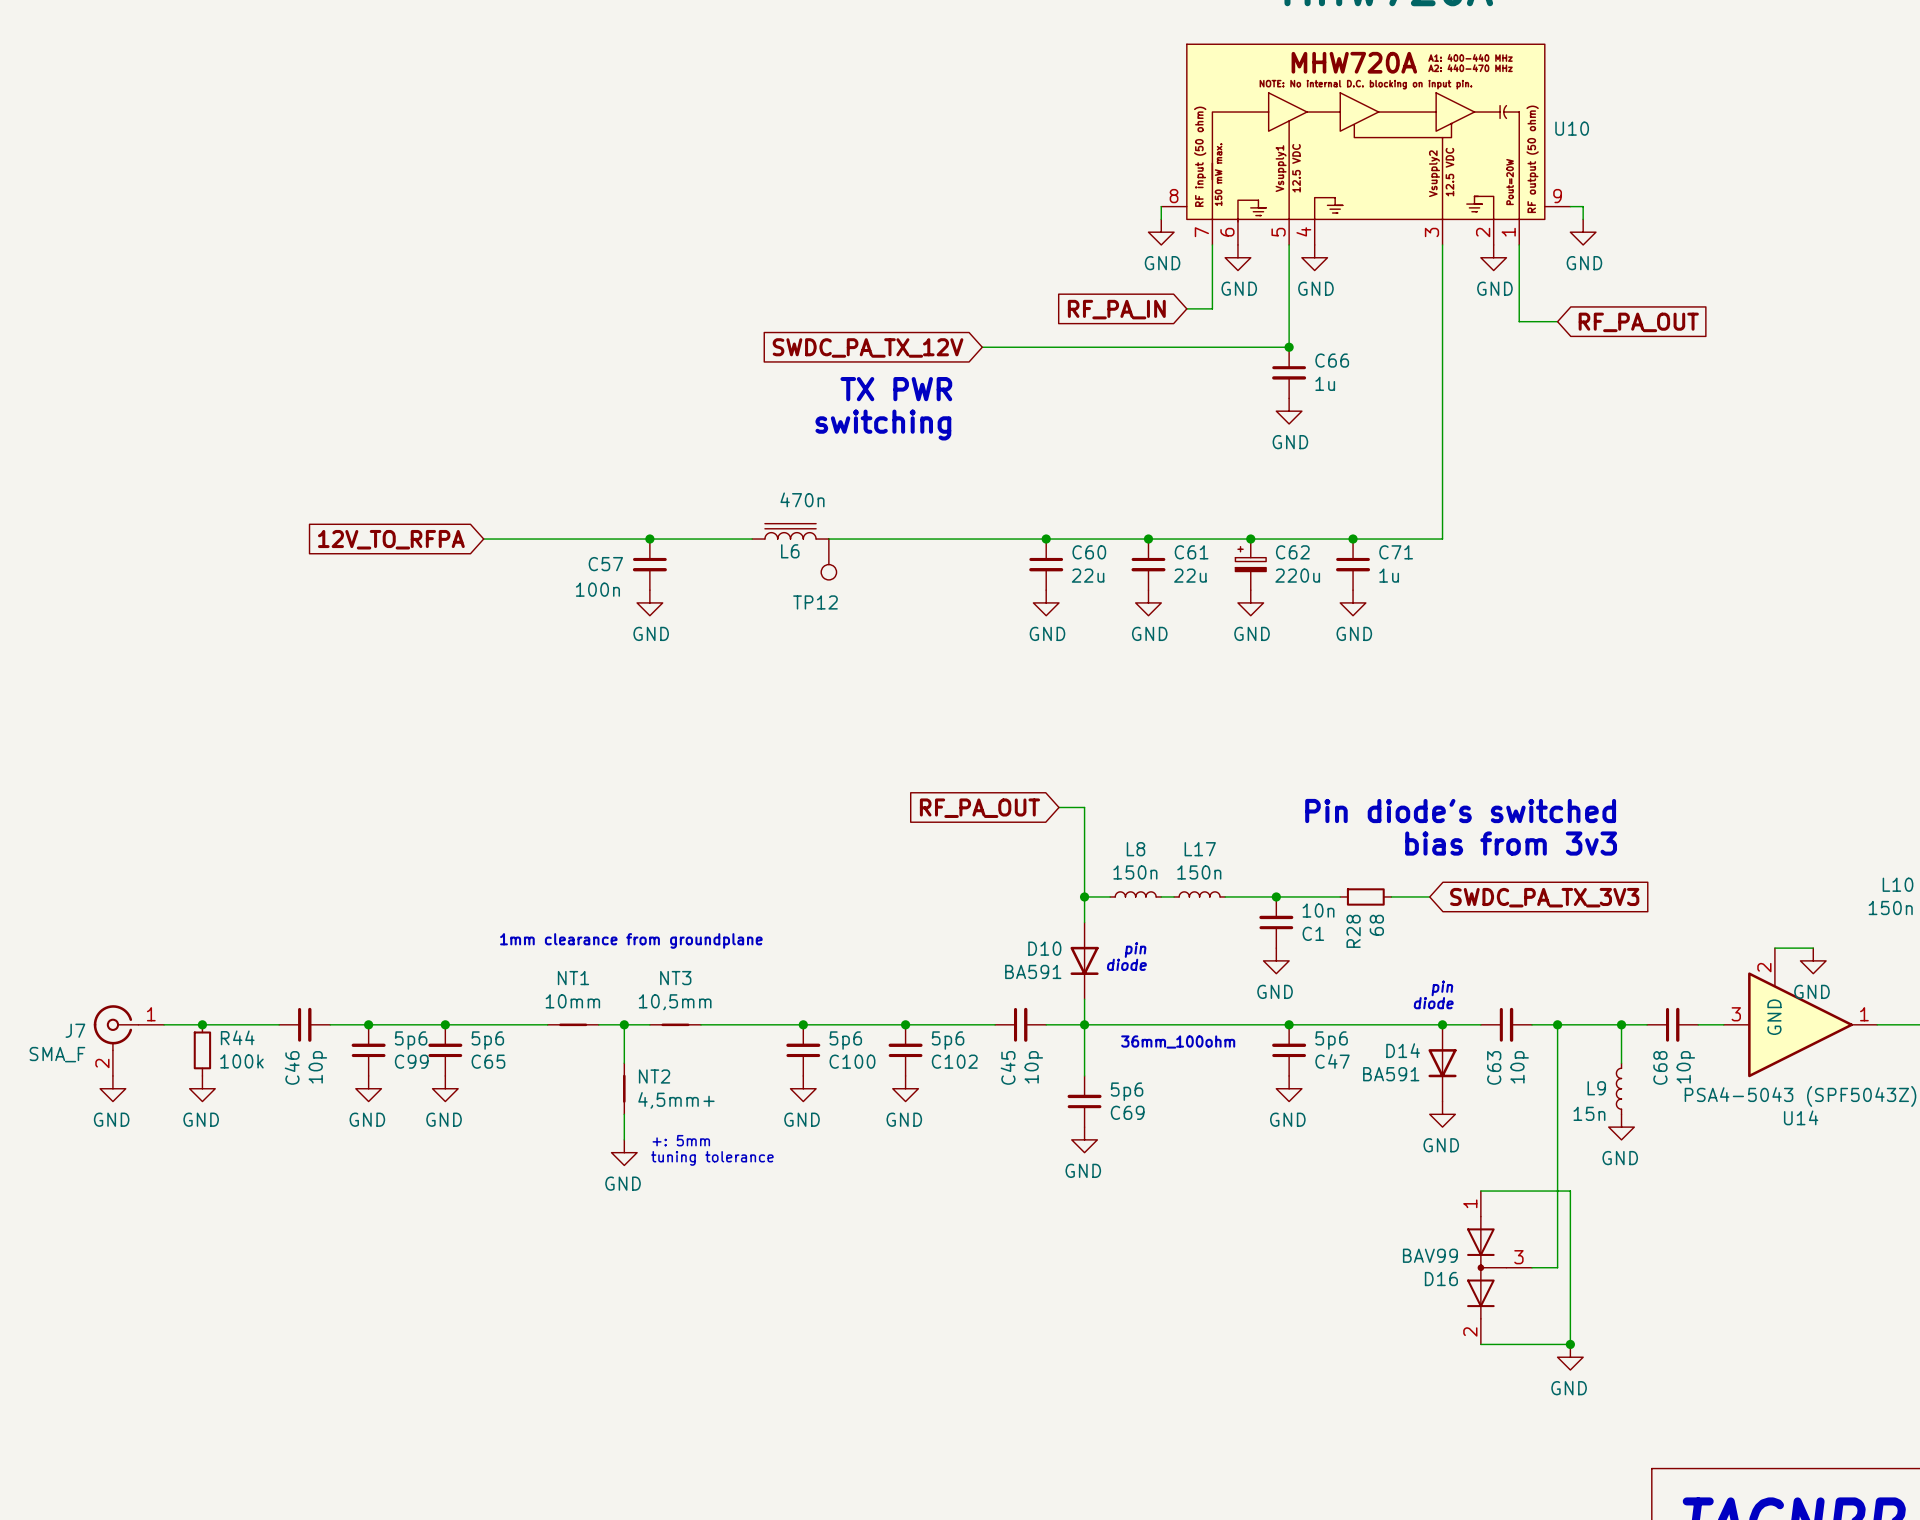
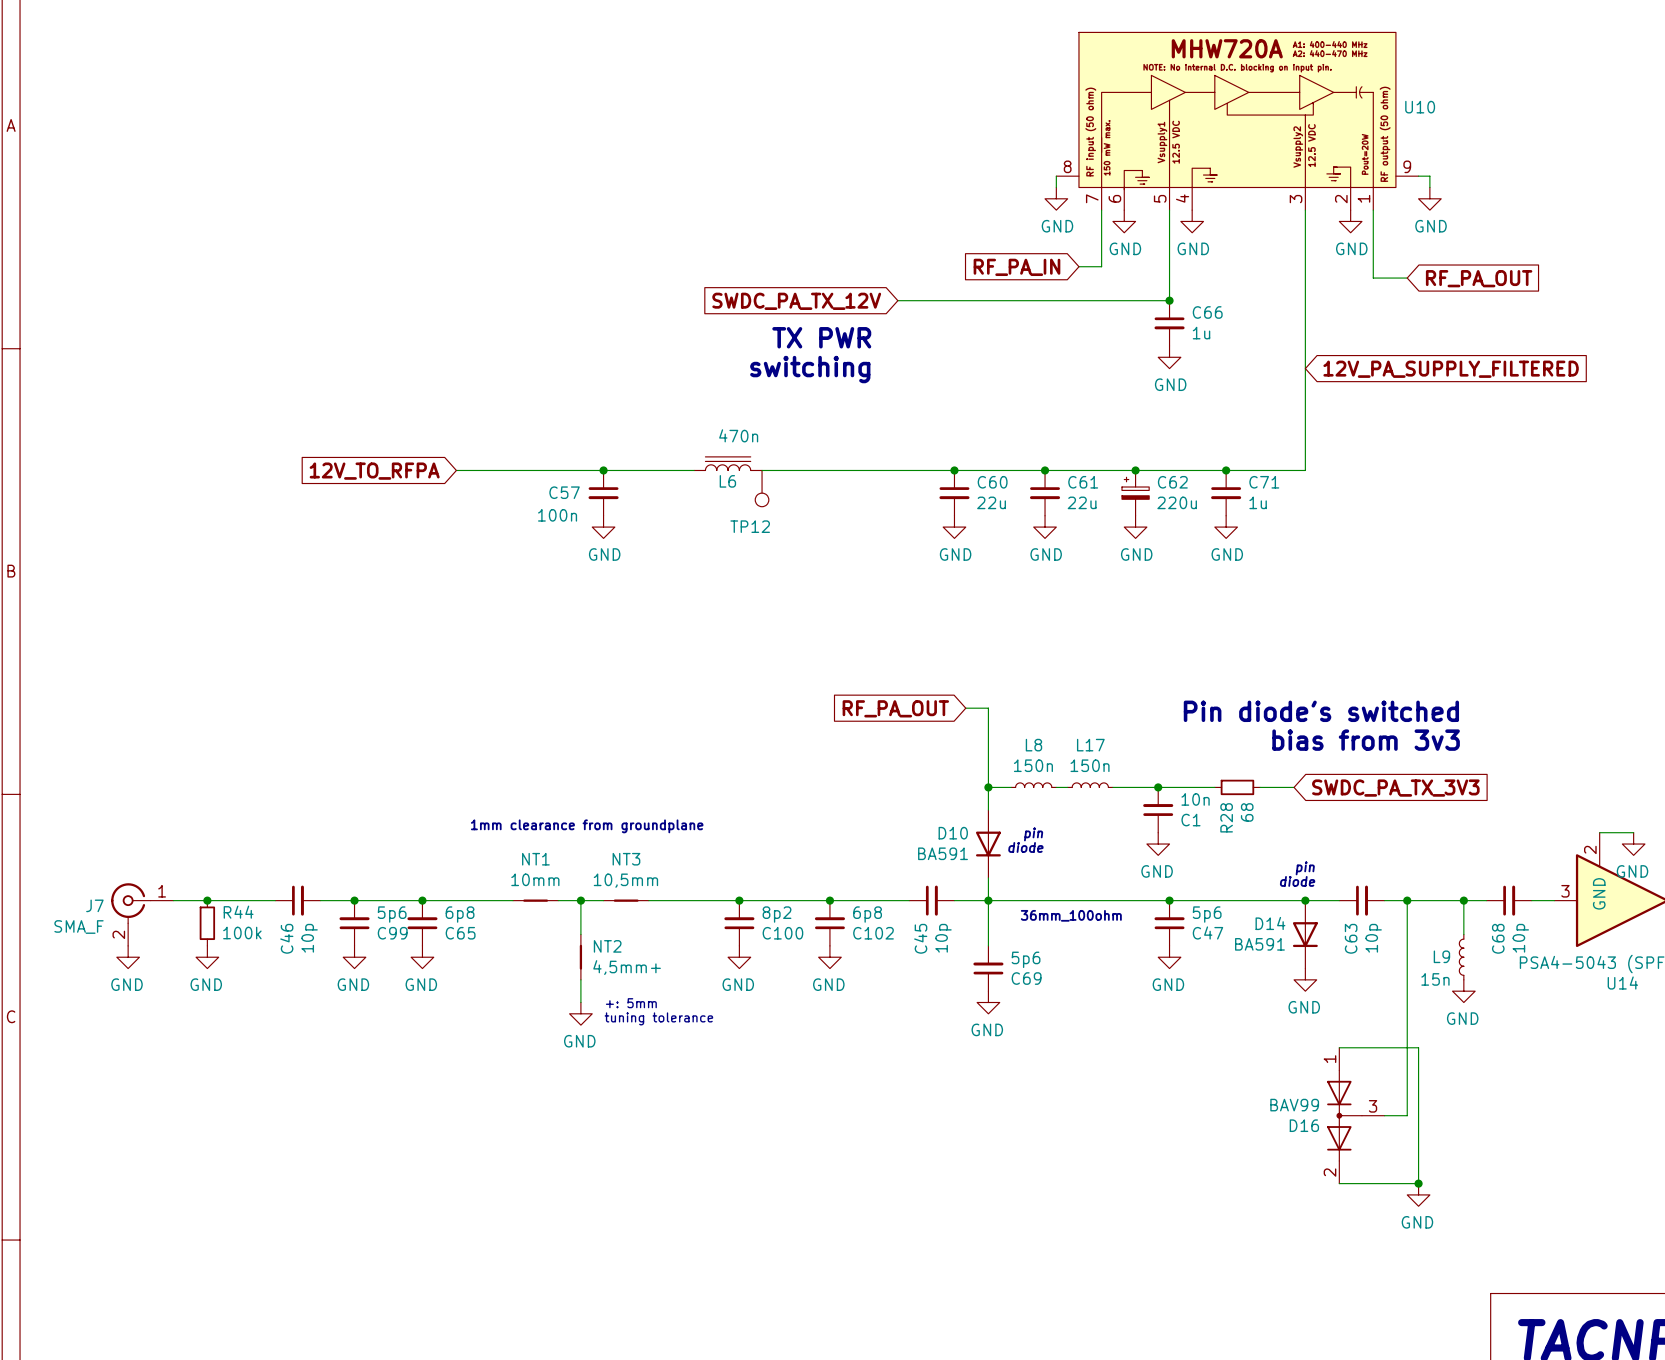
global label: none -> 12V_PA_SUPPLY_FILTERED (1451, 369)
C65 value: 5p6 (487, 1040) -> 6p8 (460, 914)
C100 value: 5p6 (845, 1040) -> 8p2 (777, 914)
C102 value: 5p6 (948, 1040) -> 6p8 (867, 914)

